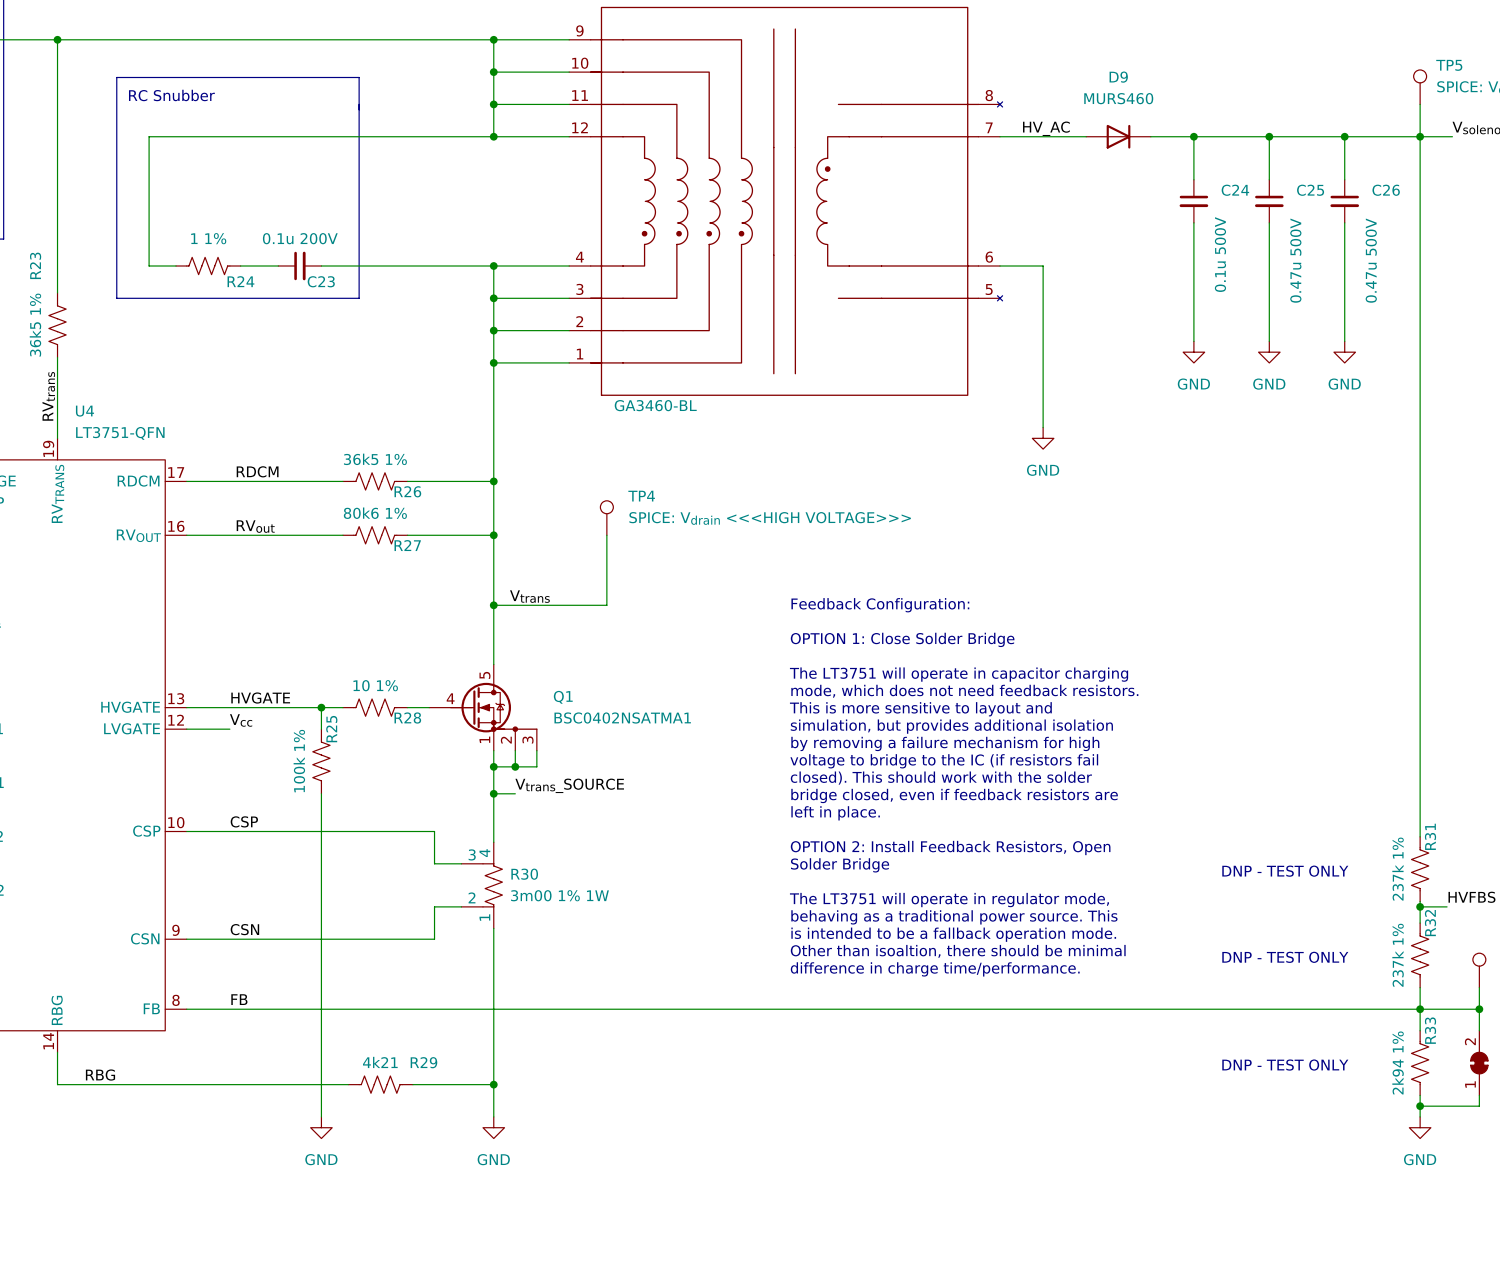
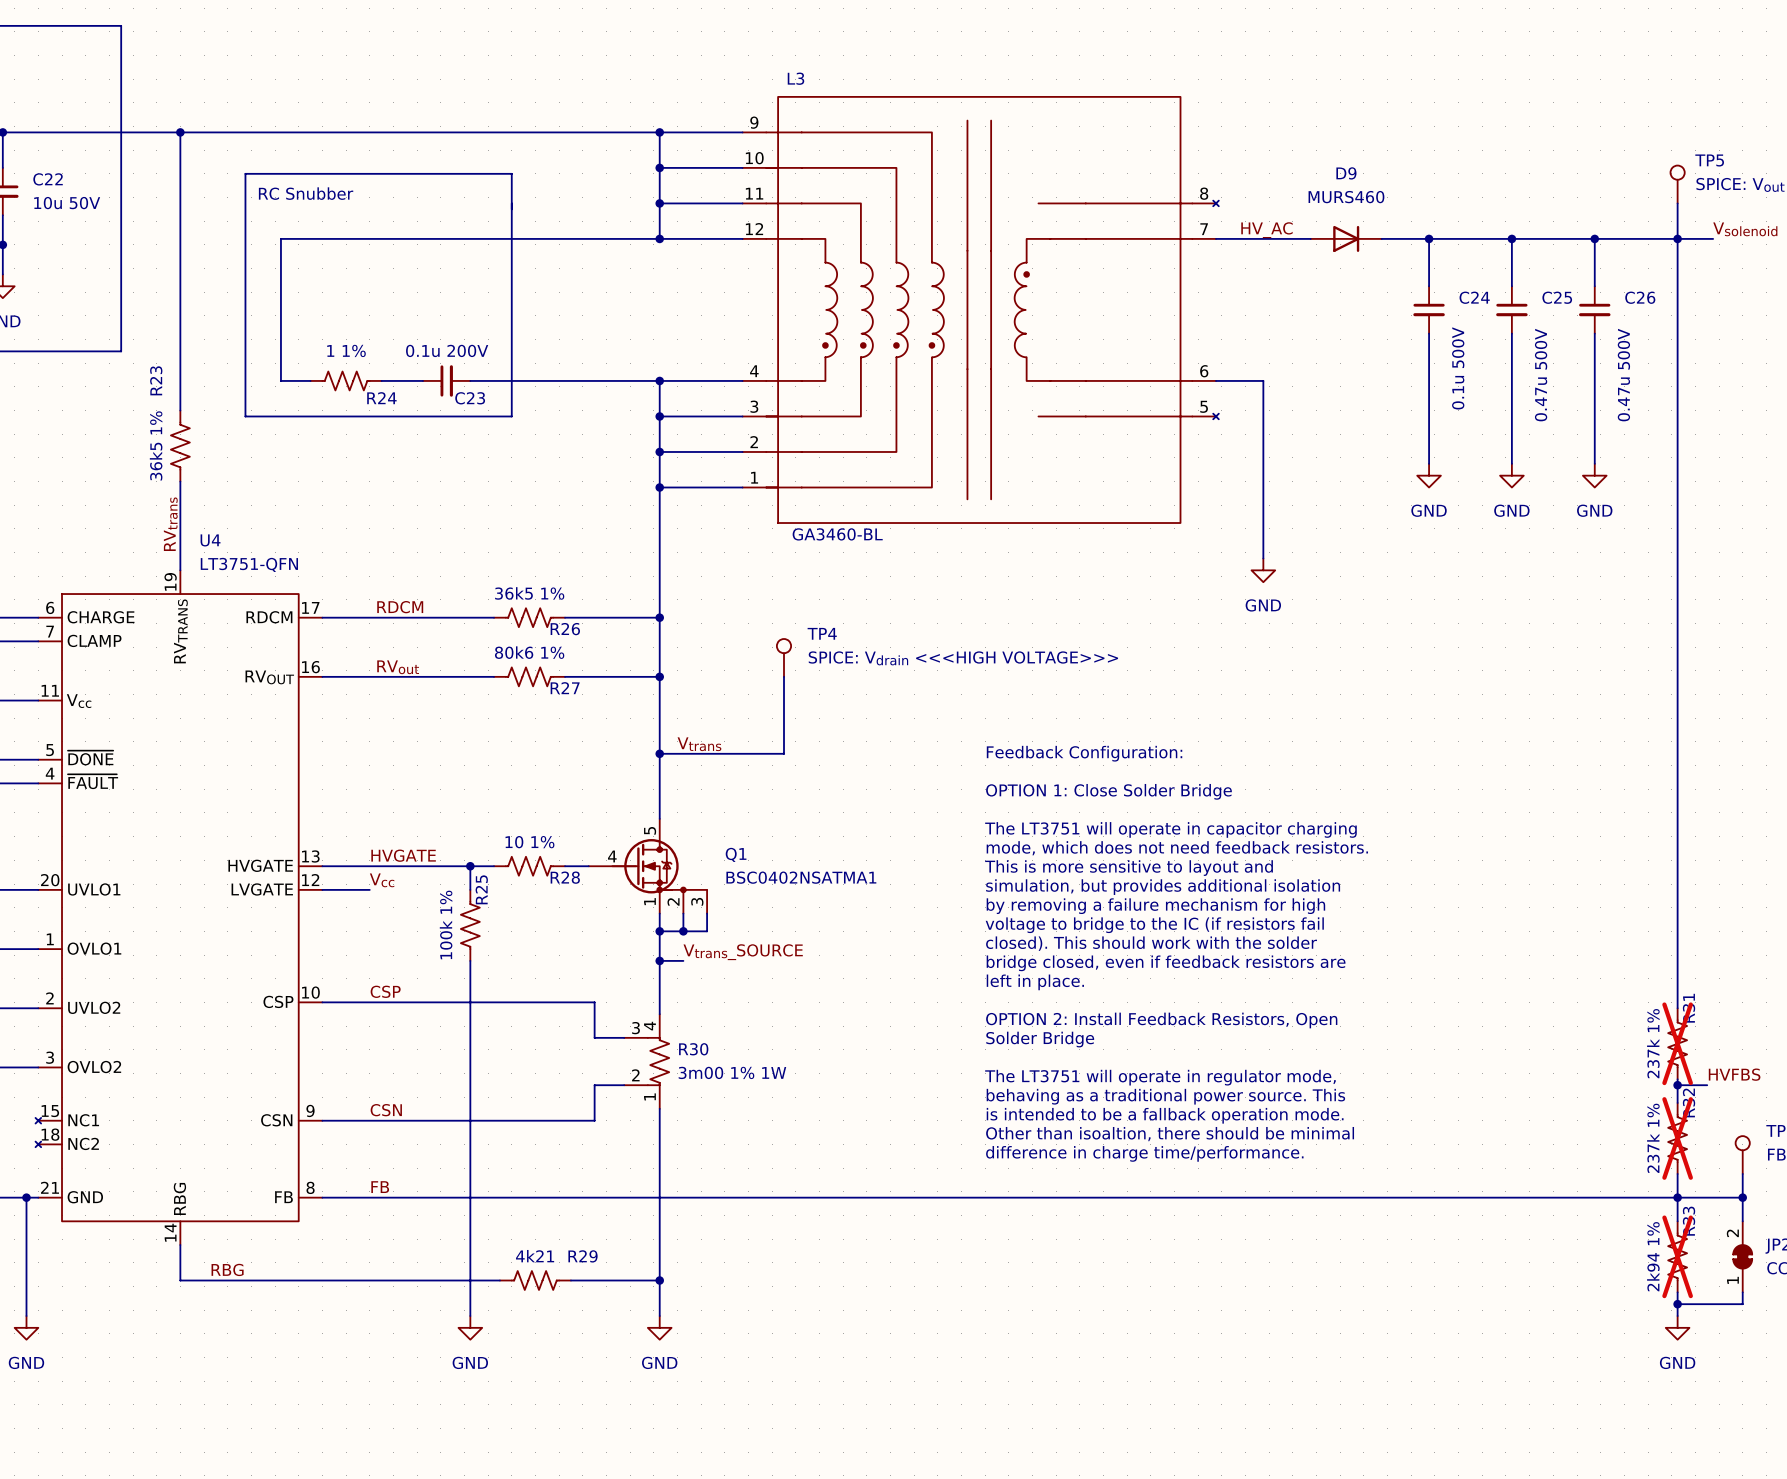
R31 do-not-place cross: none -> (1677, 1043)
text: DNP - TEST ONLY (1285, 871) -> none
R32 do-not-place cross: none -> (1677, 1138)
text: DNP - TEST ONLY (1285, 957) -> none
R33 do-not-place cross: none -> (1677, 1256)
text: DNP - TEST ONLY (1285, 1065) -> none

